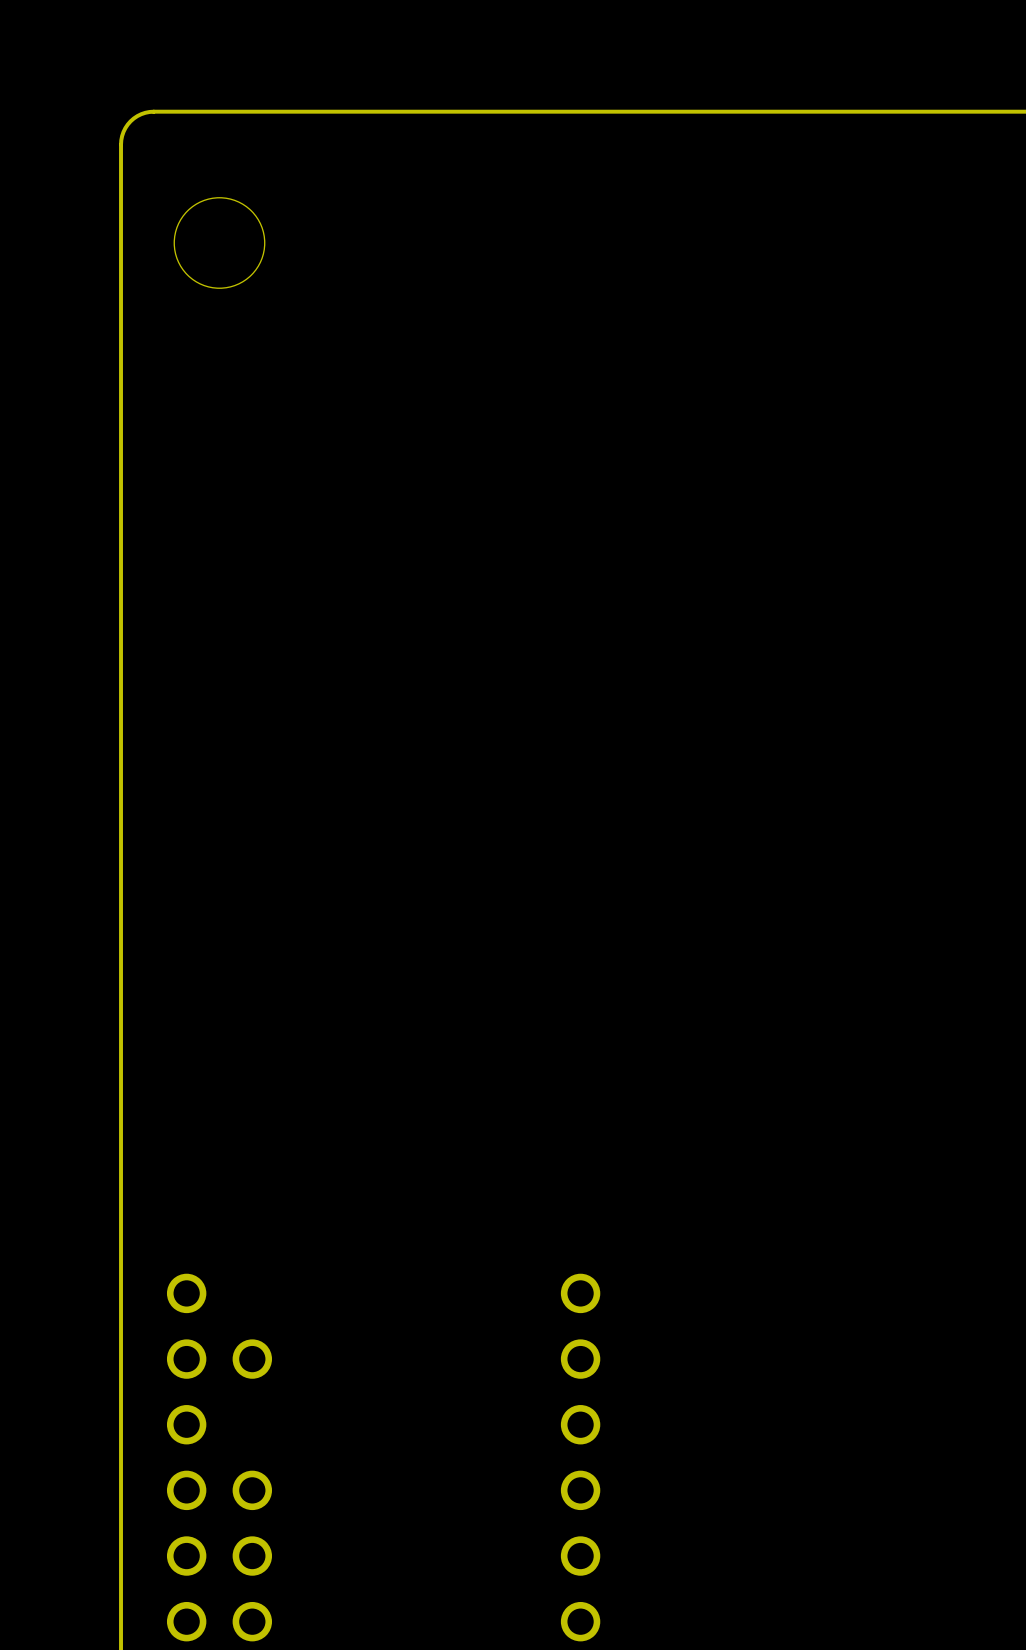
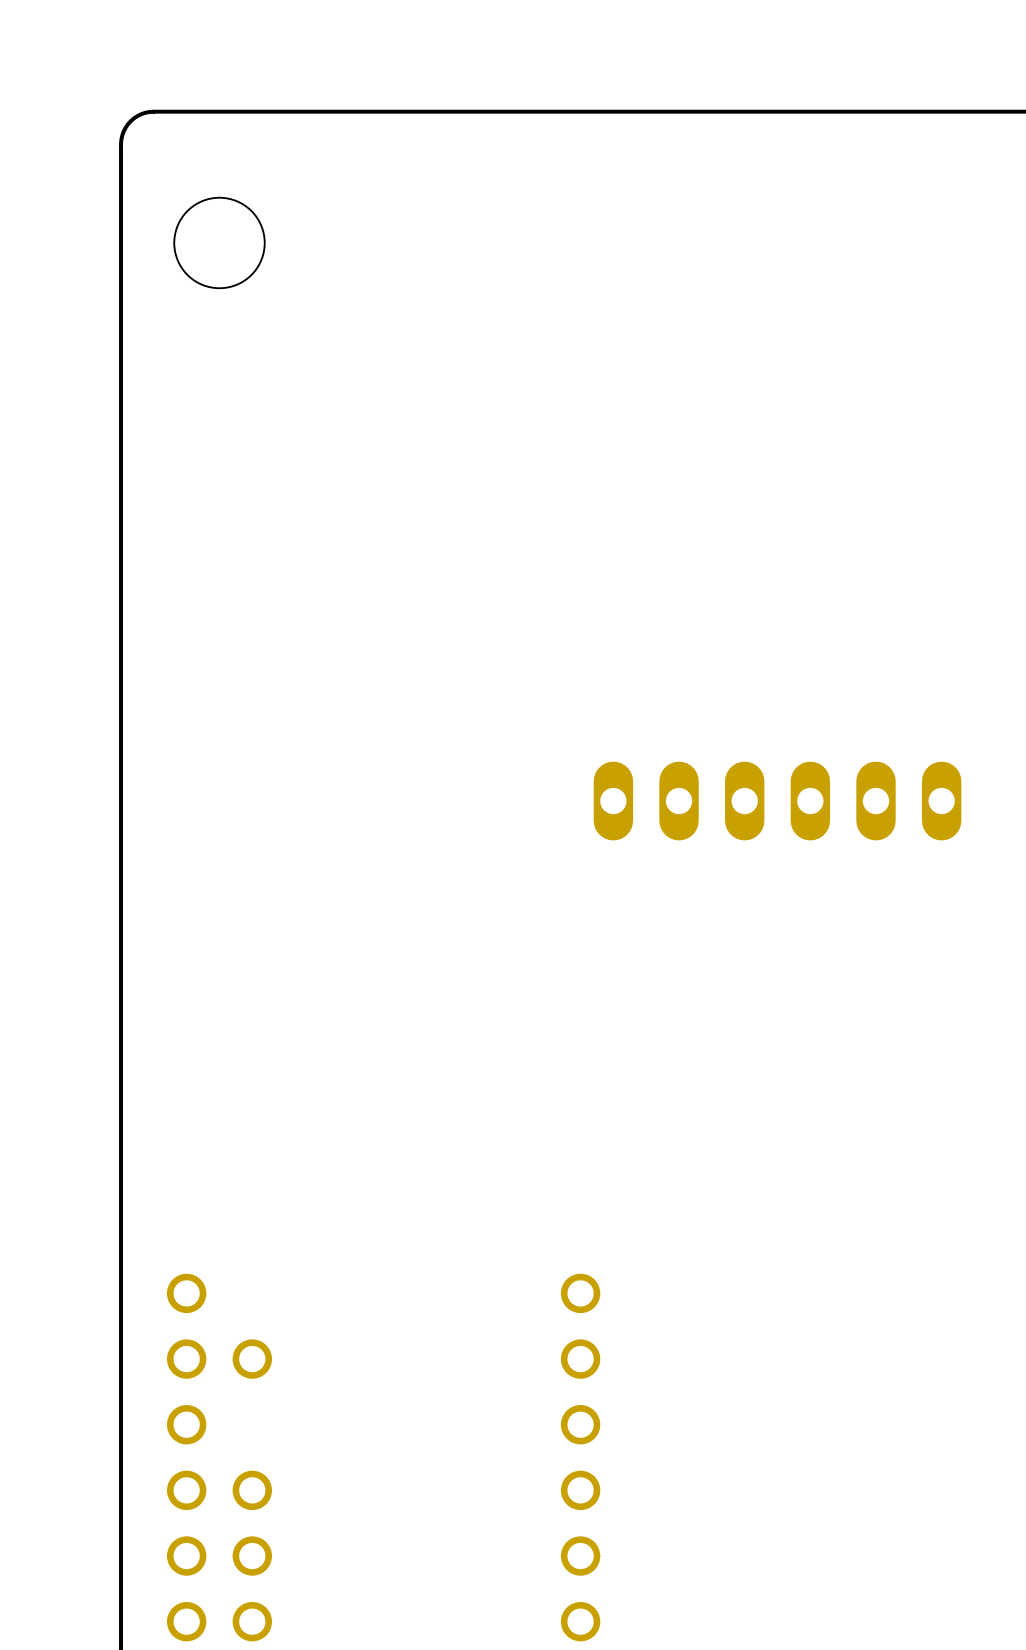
part: none -> (777, 801)

